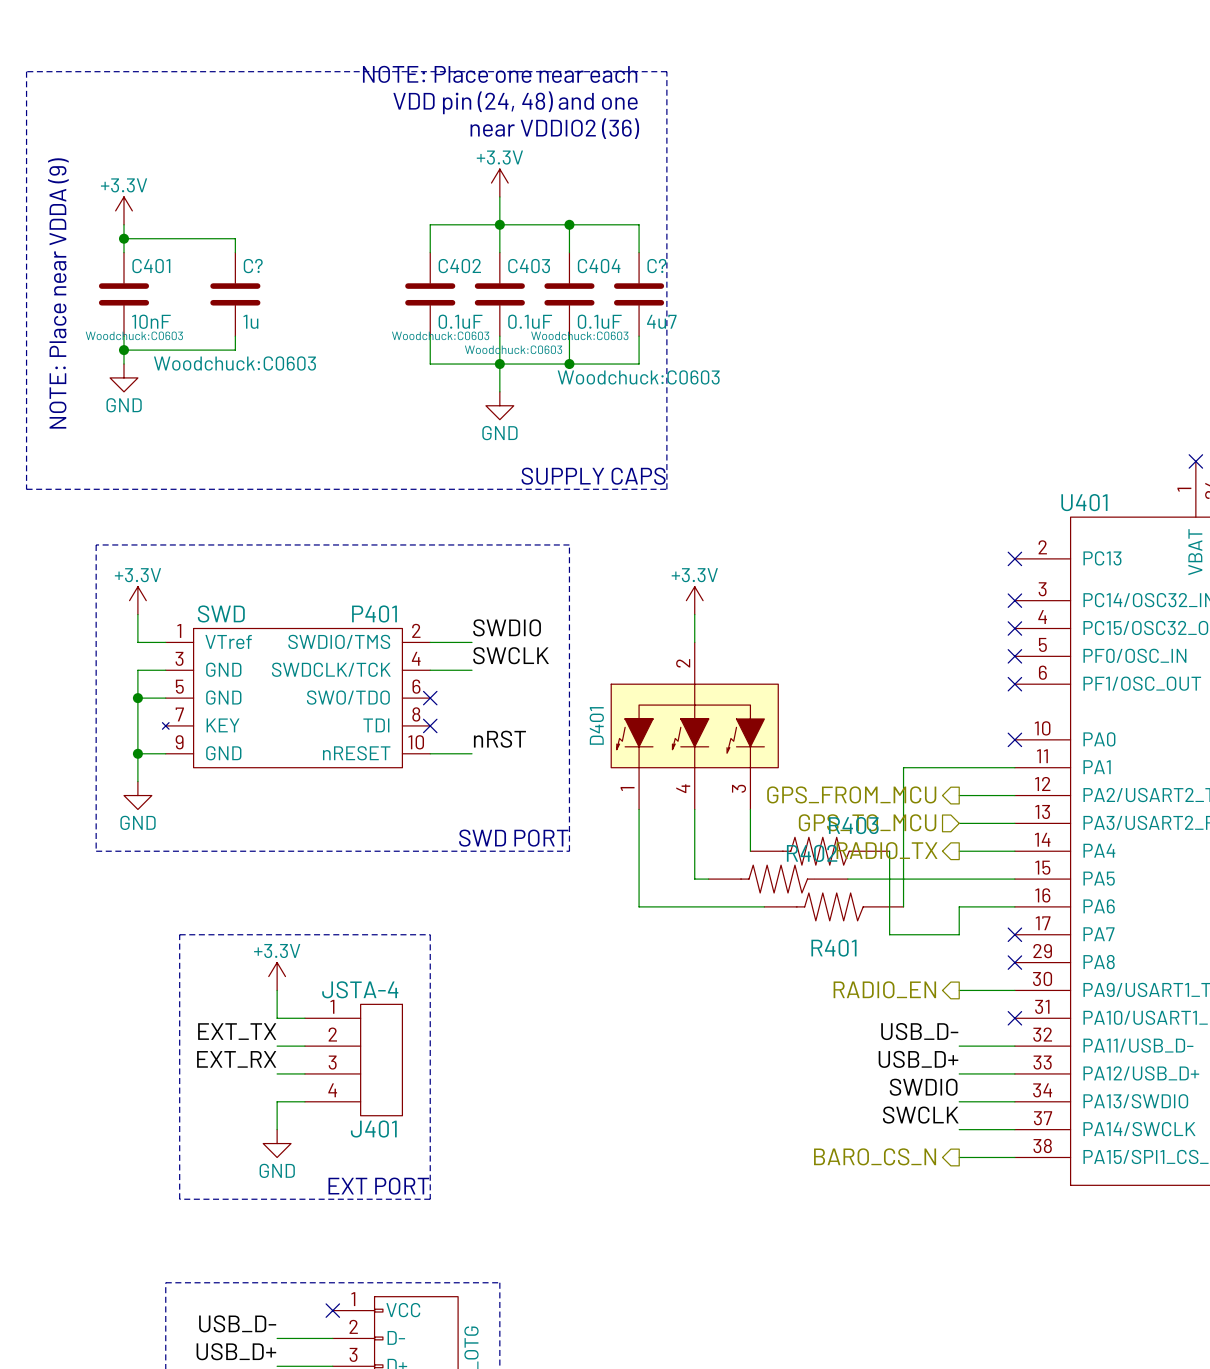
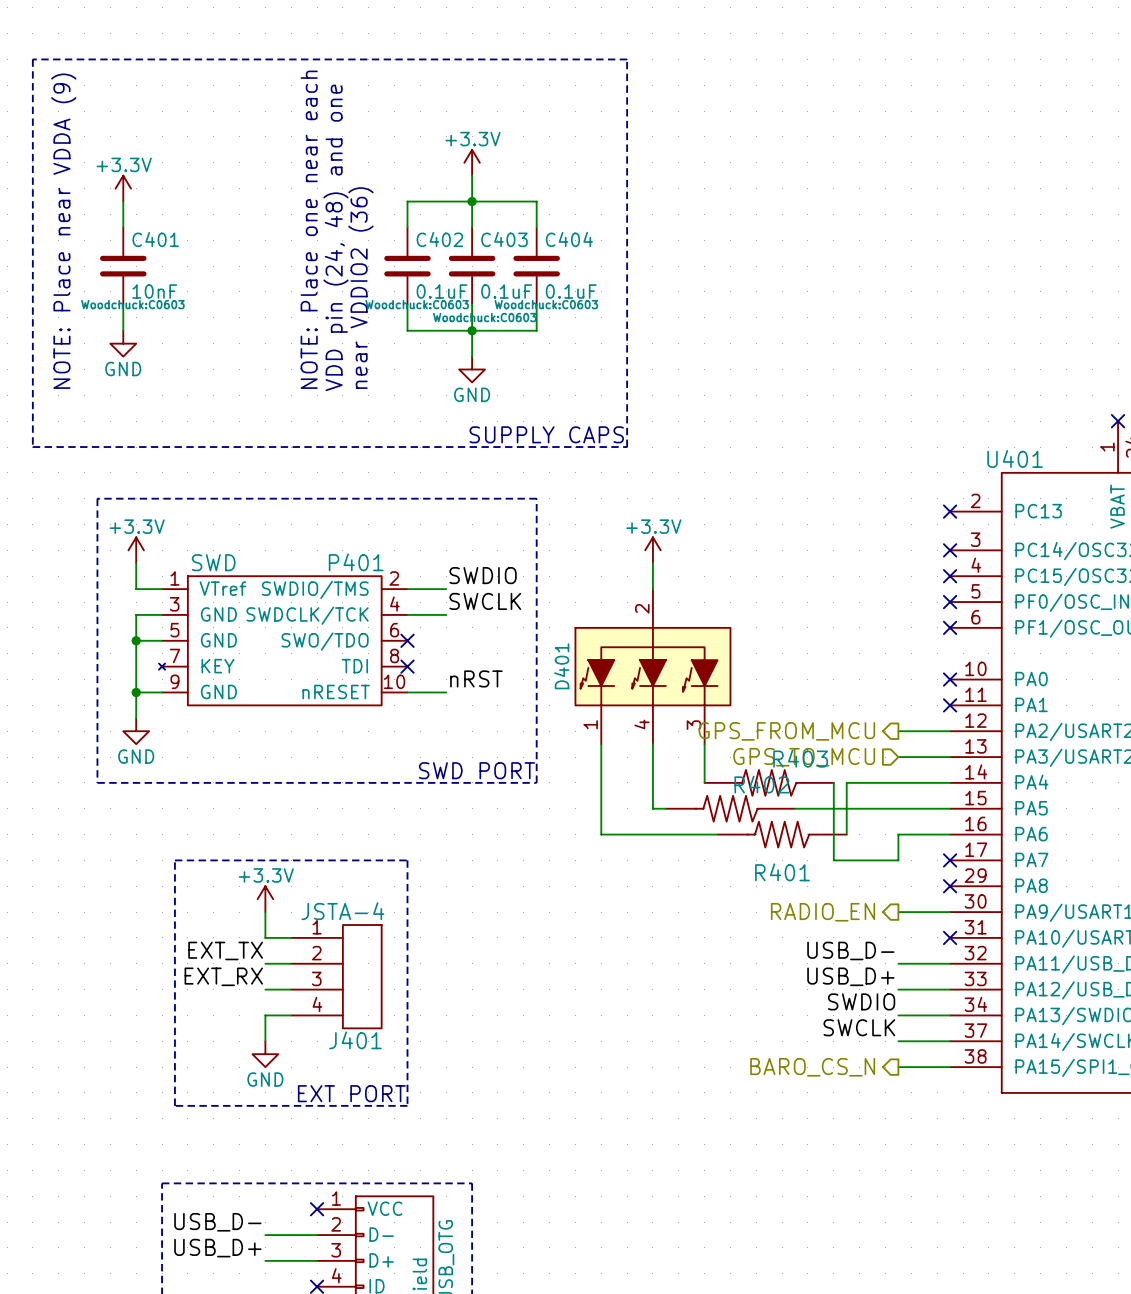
text: NOTE: Place one near each (500, 74) -> none
text: VDD pin (24, 48) and one (515, 102) -> none
text: near VDDIO2 (36) (554, 128) -> none
wire: (569, 224) (639, 224) (639, 252) -> none
junction: (569, 224) -> none
wire: (123, 238) (235, 238) (235, 252) -> none
junction: (123, 238) -> none
text: none -> NOTE: Place one near each (309, 229)
C?: 1u (235, 294) -> none
C?: 4u7 (639, 294) -> none
text: none -> VDD pin (24, 48) and one (335, 237)
wire: (235, 336) (235, 350) (123, 350) -> none
wire: (639, 336) (639, 364) (569, 364) -> none
text: none -> near VDDIO2 (36) (360, 288)
junction: (123, 350) -> none
junction: (569, 364) -> none
wire: (1014, 767) (903, 767) (903, 851) -> (898, 782) (846, 782)
no-connect mark: none -> (950, 705)
hierarchical label: RADIO_TX (886, 850) -> none

